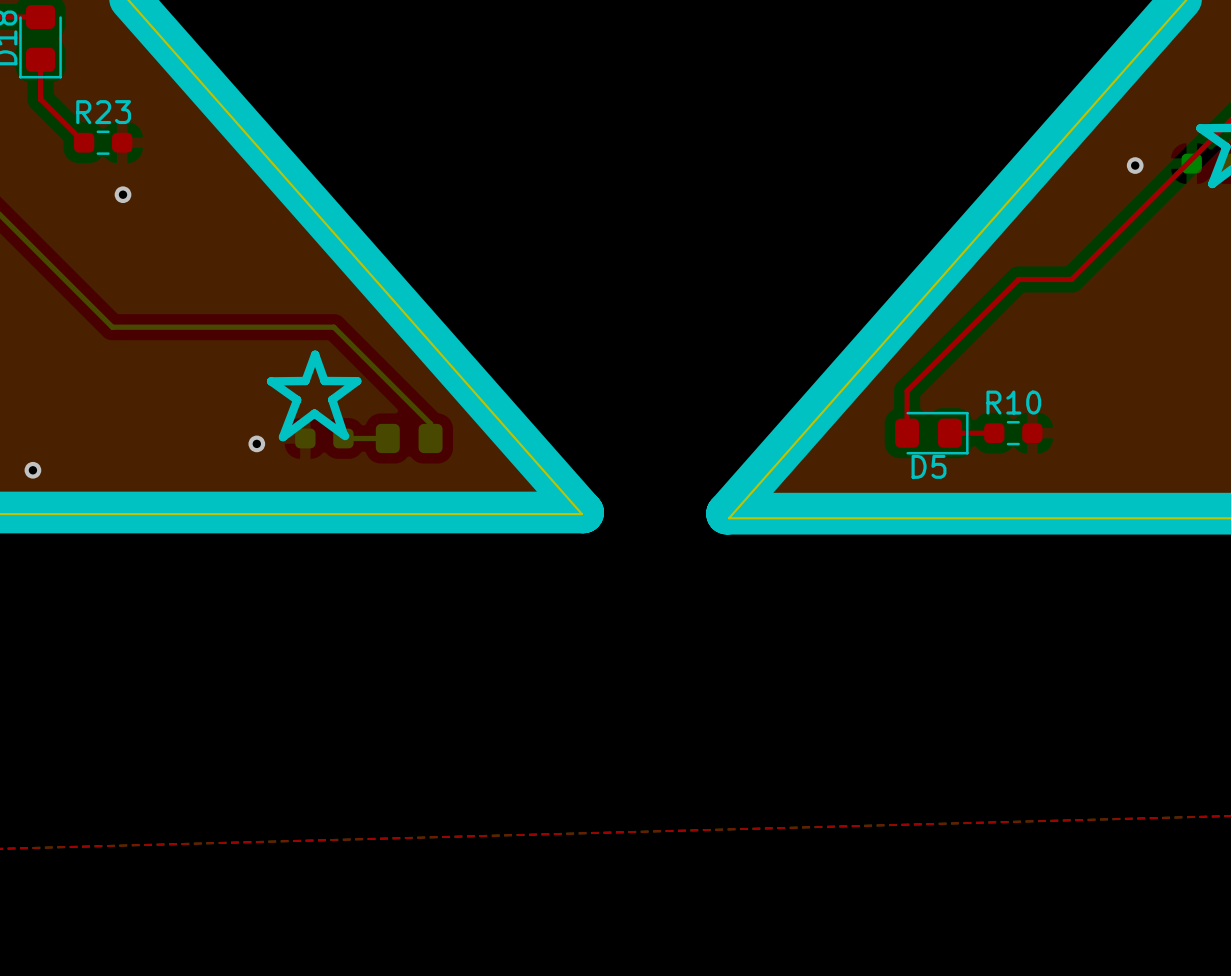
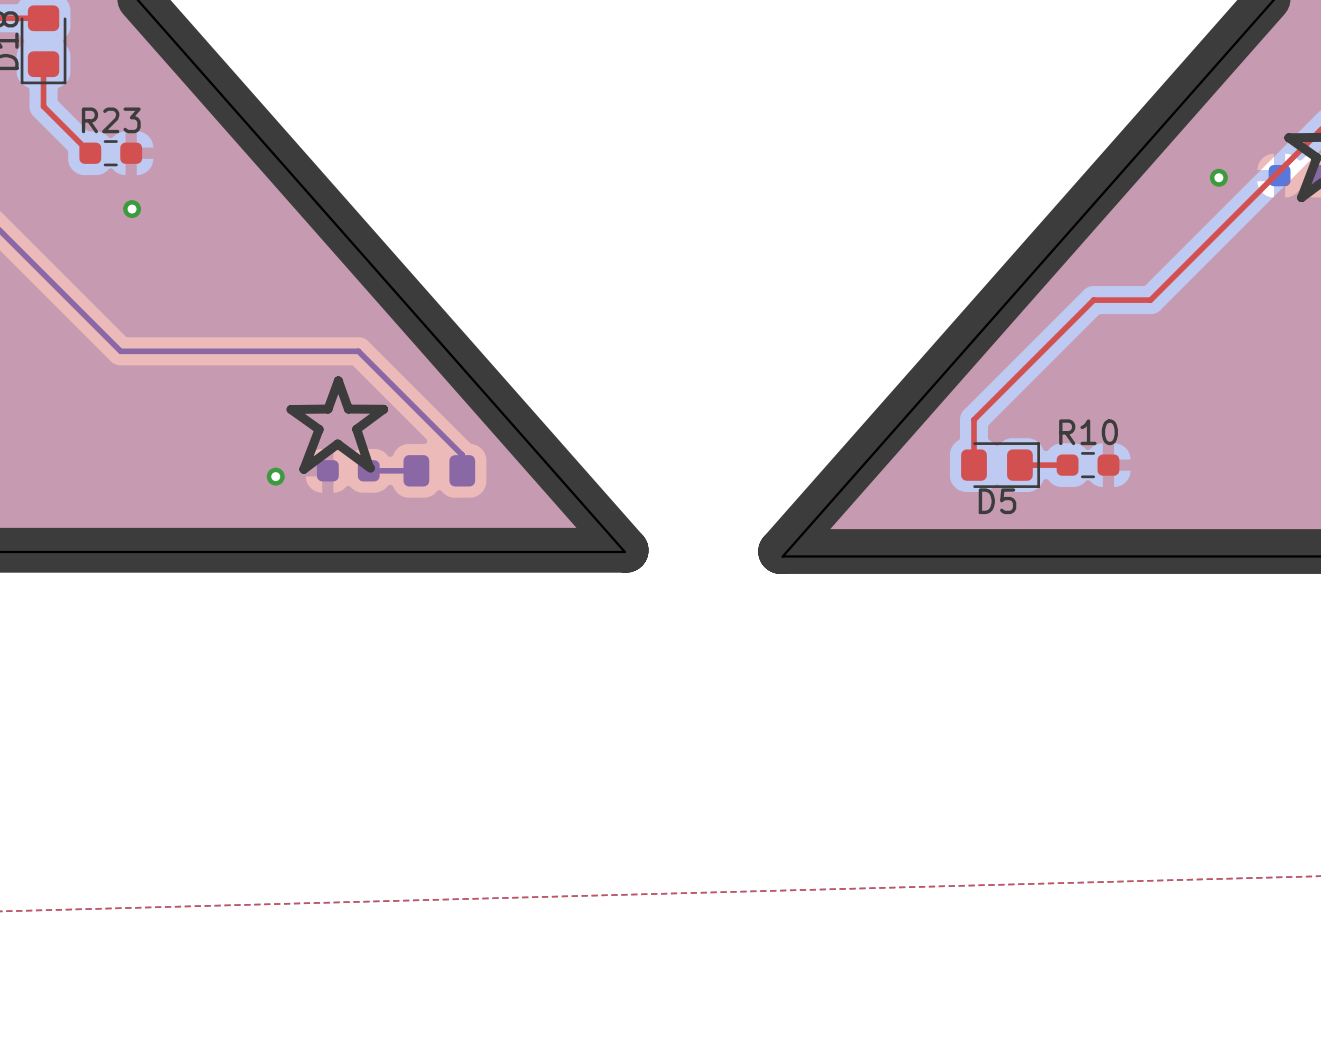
via: (32, 470) -> none

